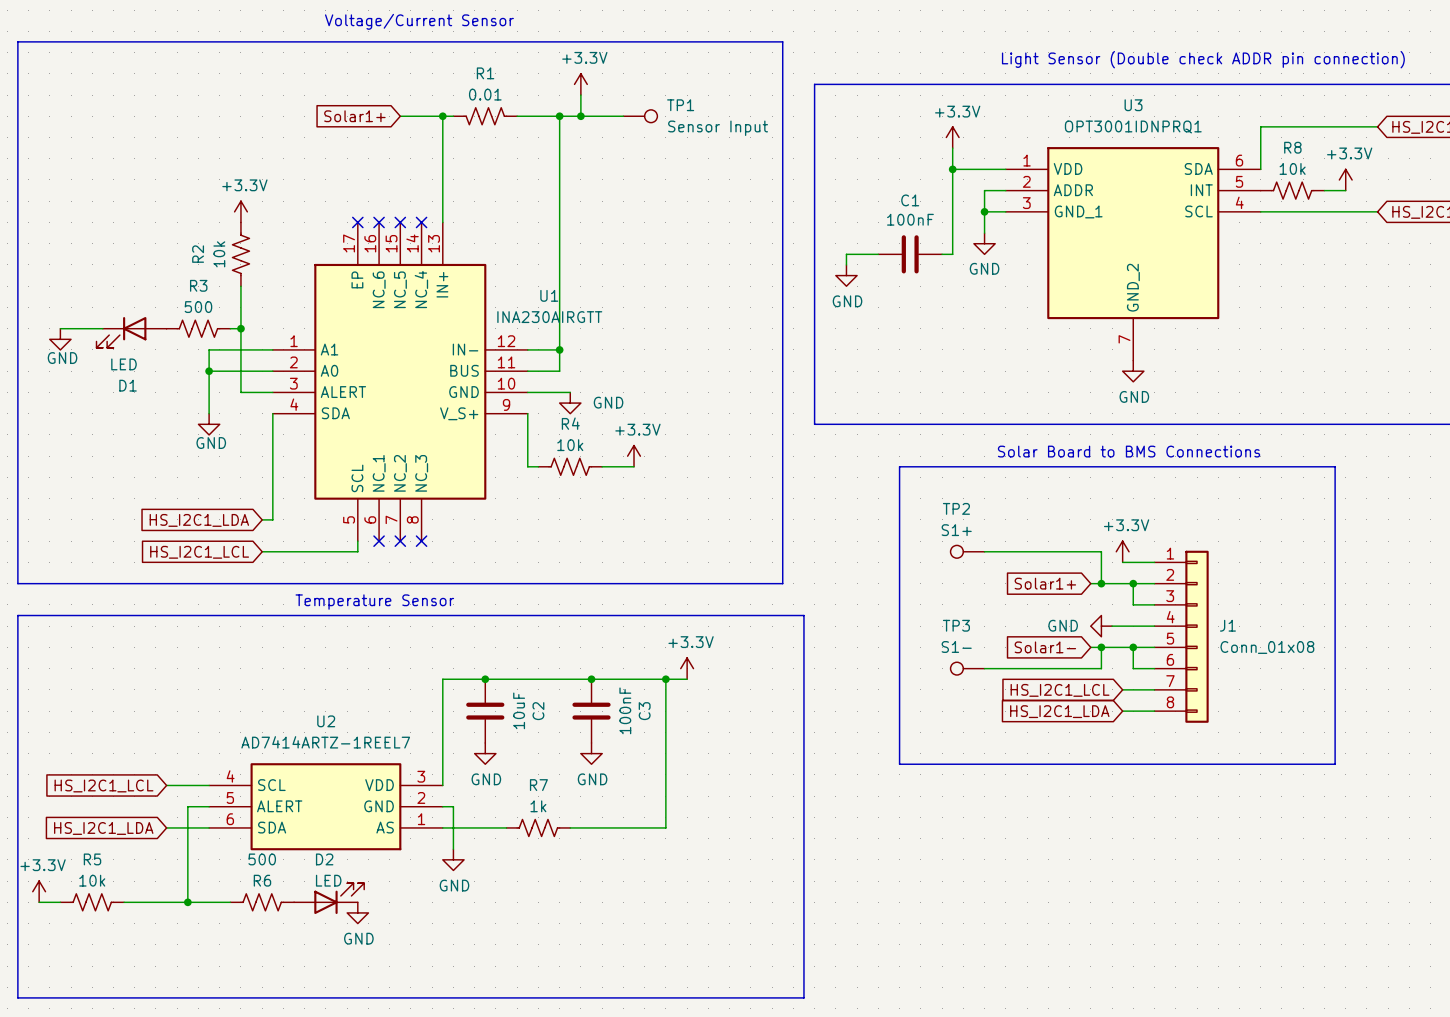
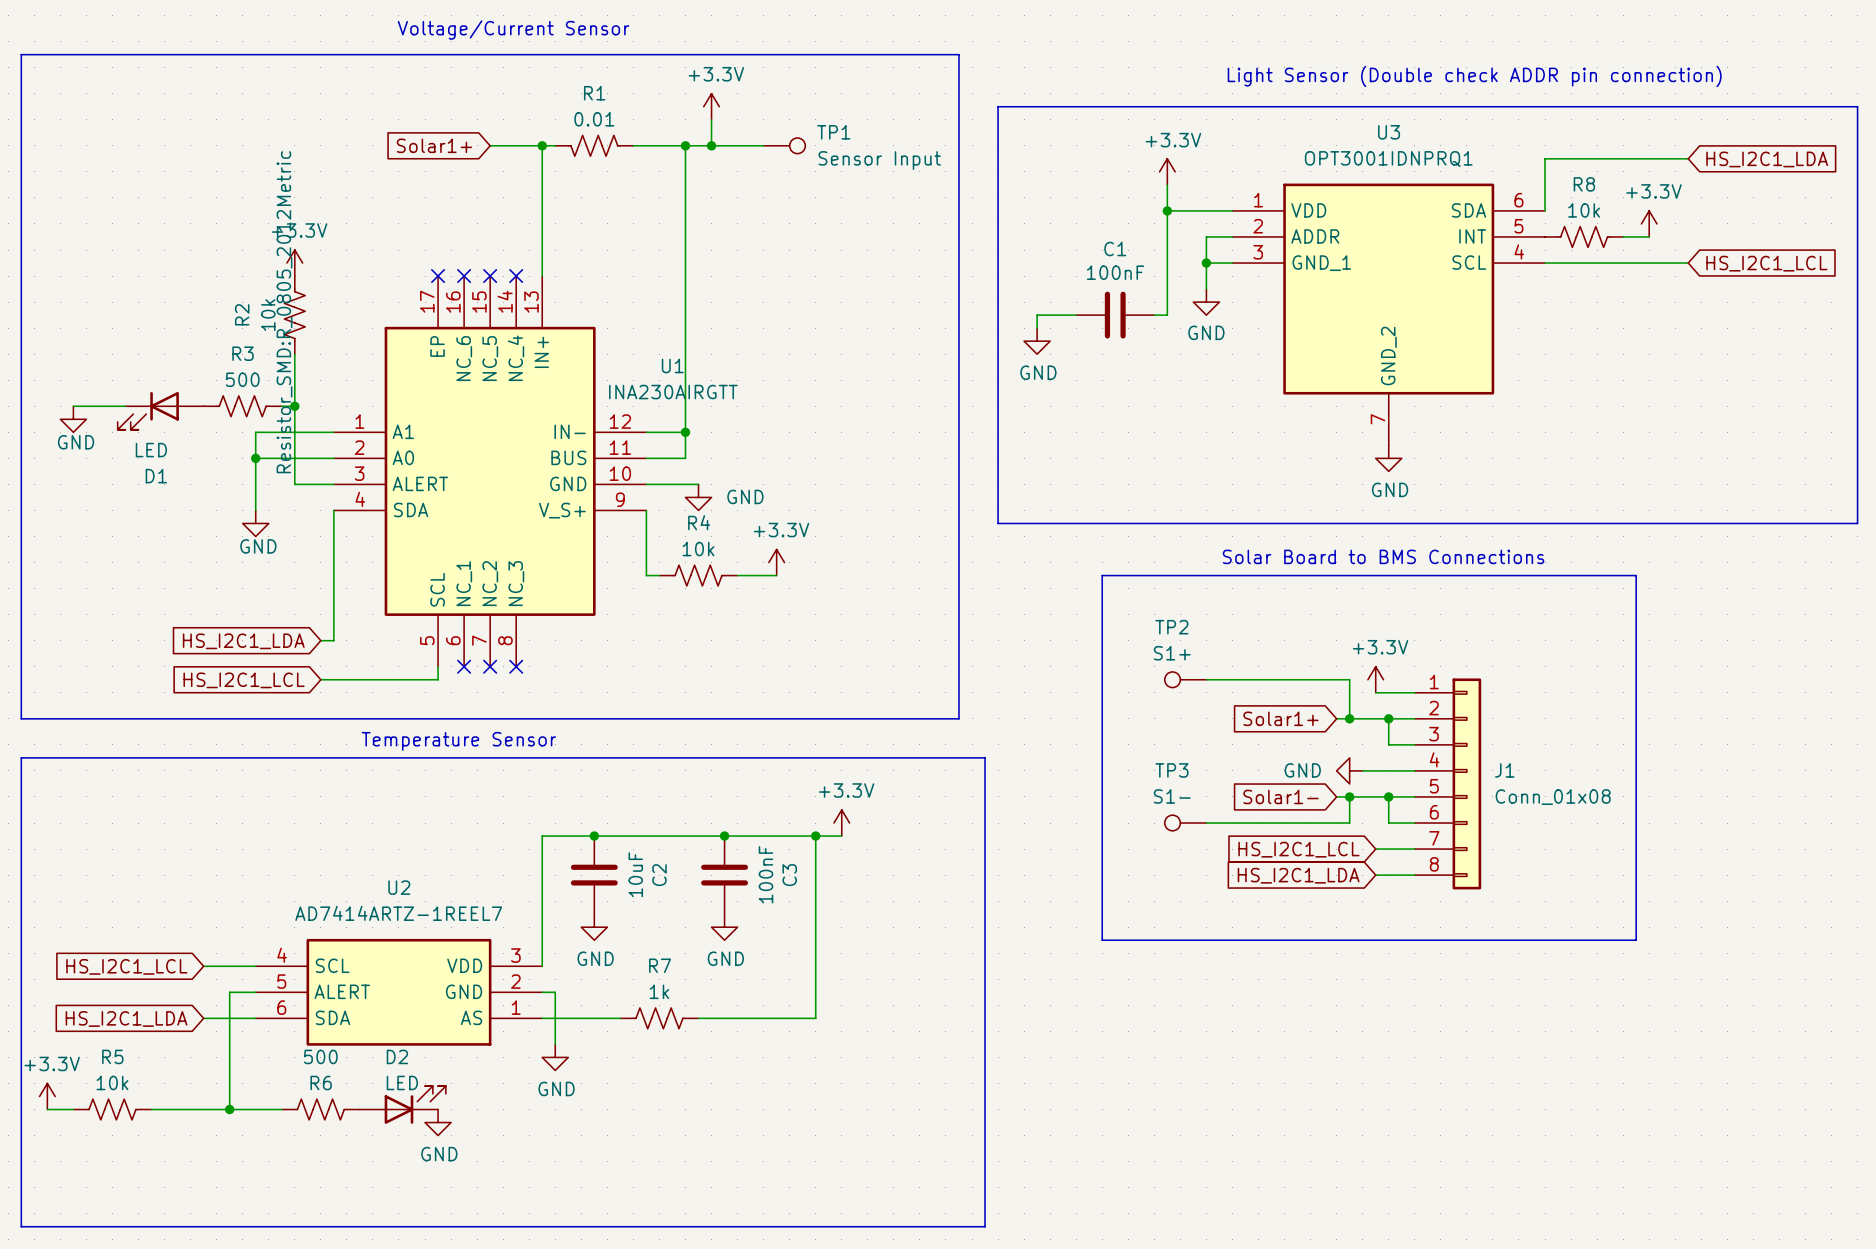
R2 text: none -> Resistor_SMD:R_0805_2012Metric (284, 312)

